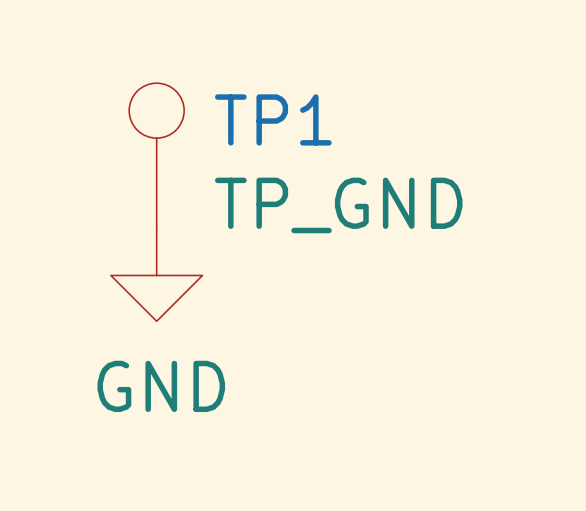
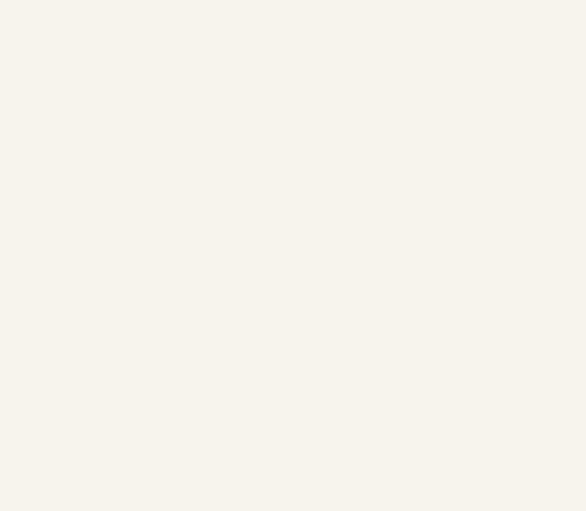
TP1: TP_GND (156, 156) -> none
power symbol: GND (156, 275) -> none

